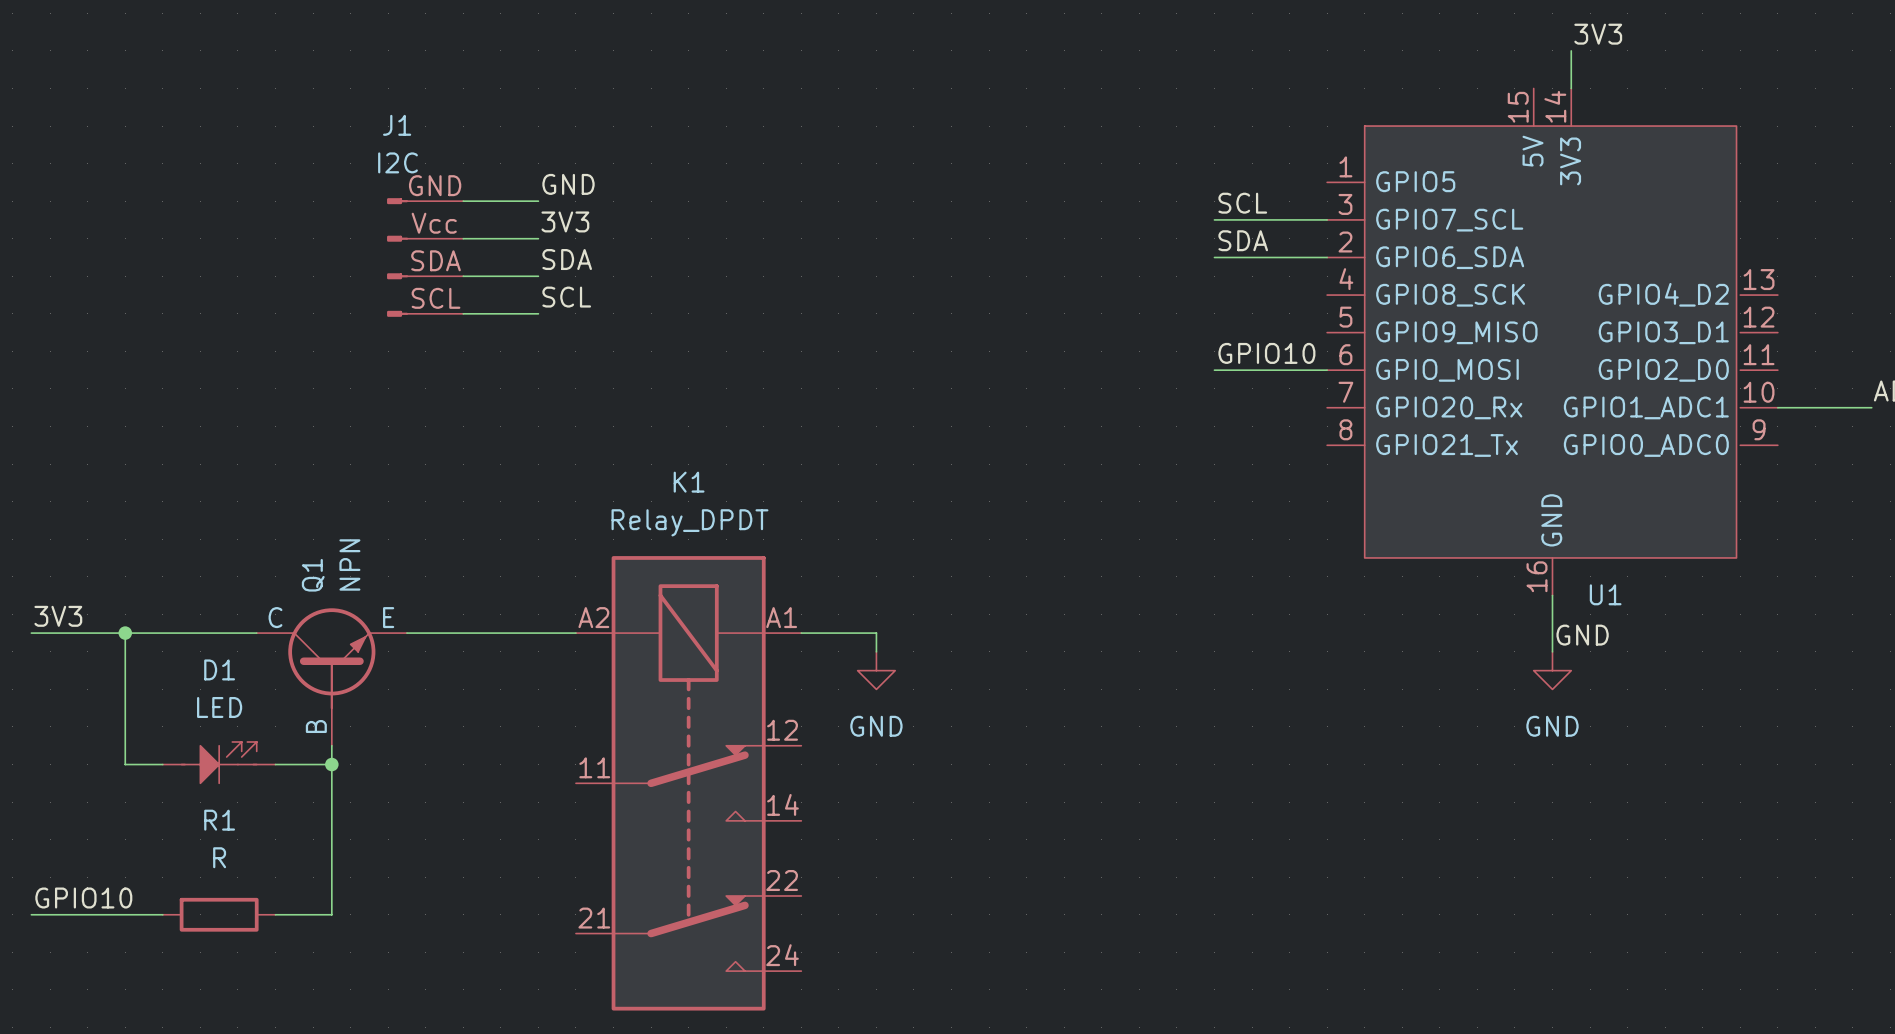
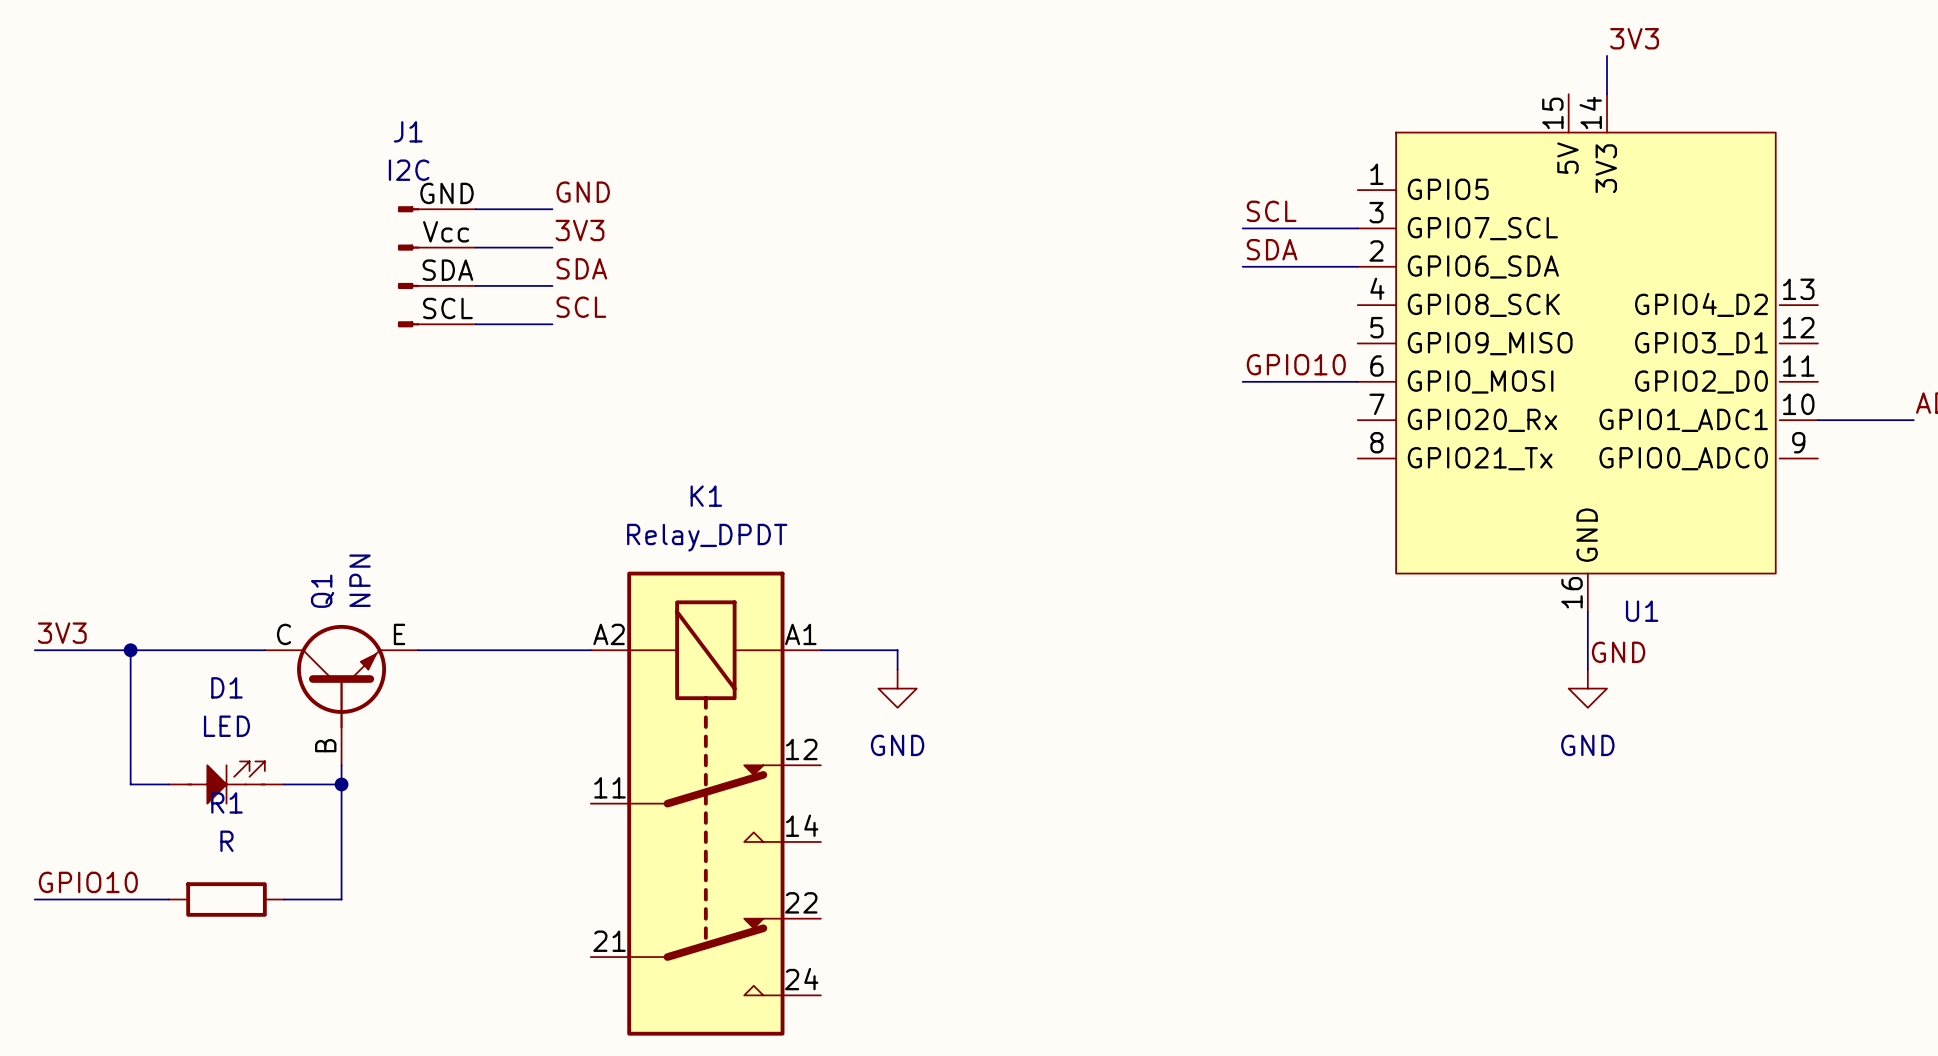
wire: (331, 877) (331, 914) (275, 914) -> (341, 899) (284, 899)
label position: GPIO10 (83, 898) -> GPIO10 (88, 882)
wire: (31, 914) (162, 914) -> (34, 899) (168, 899)
R1 position: (219, 914) -> (226, 899)

